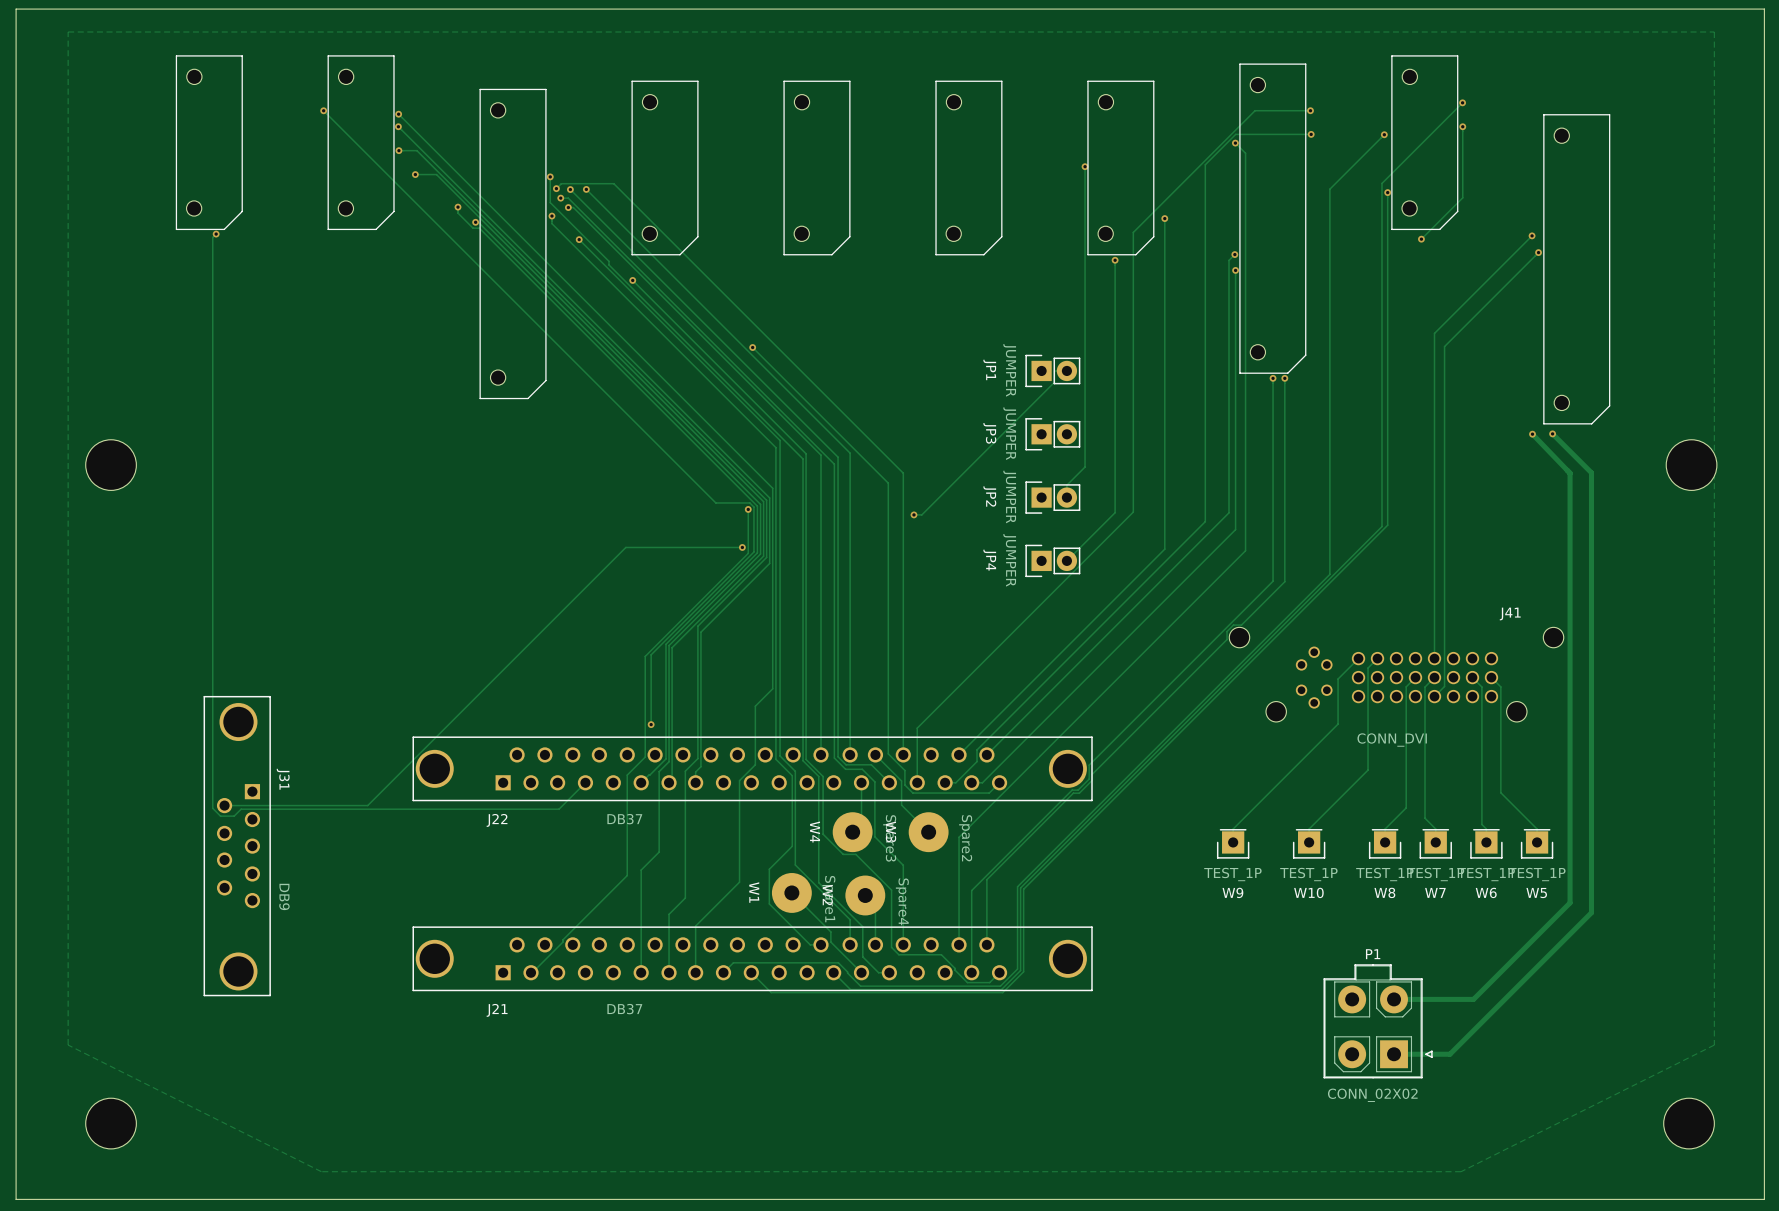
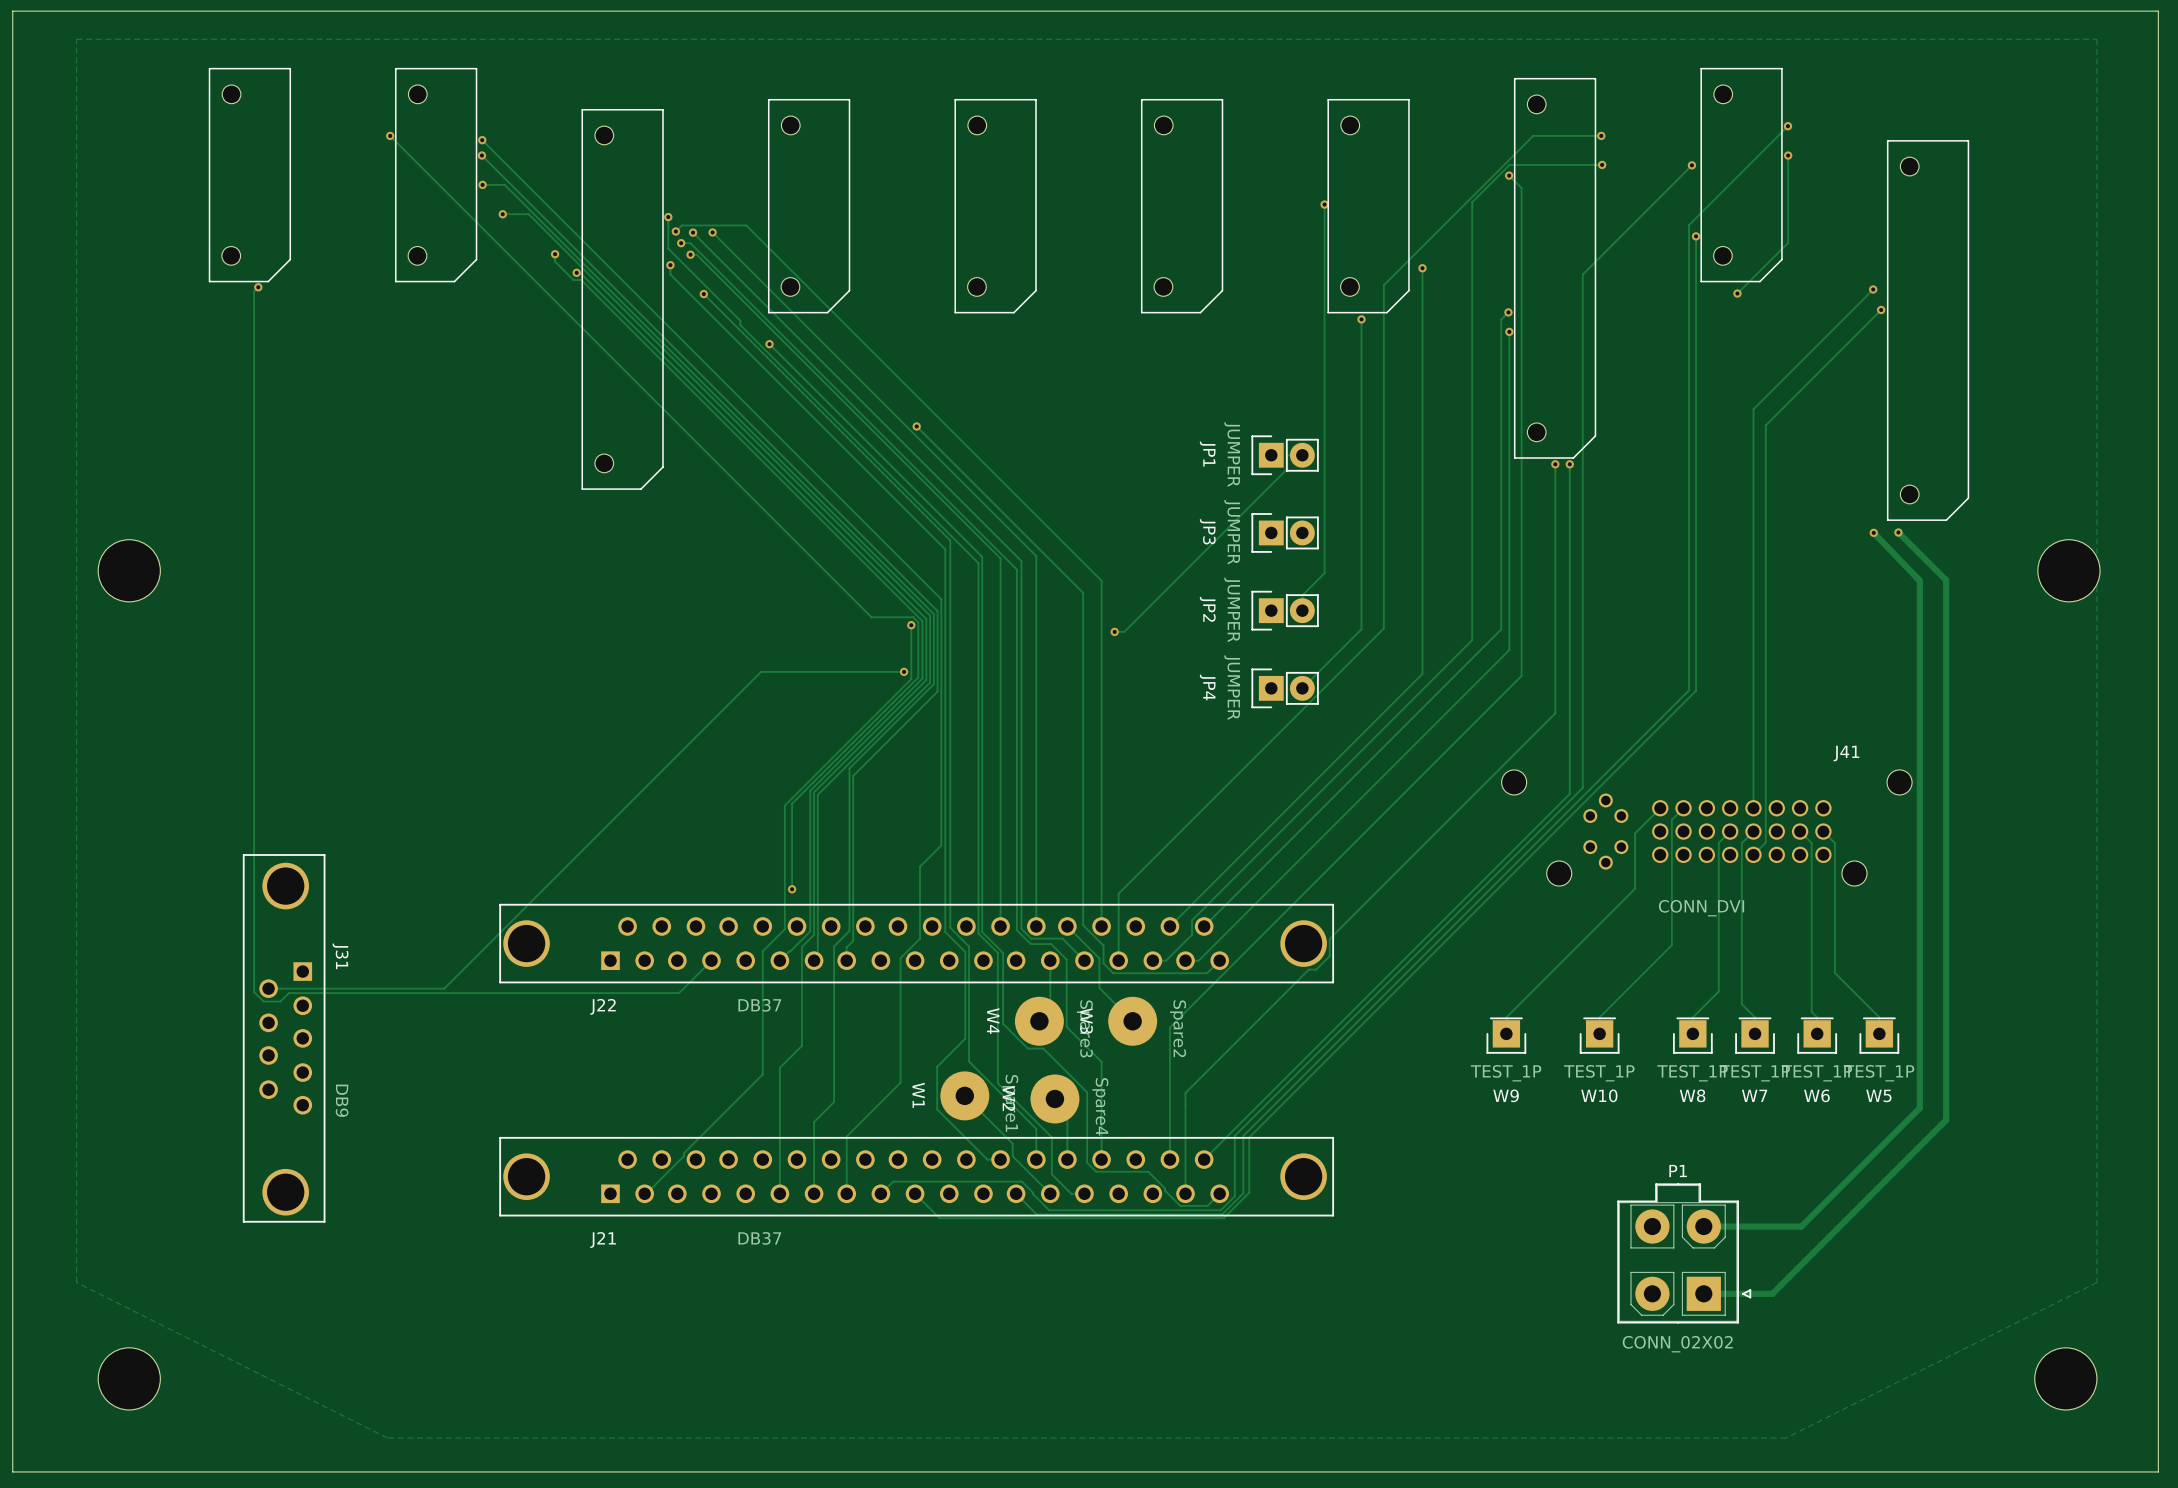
track: (1329, 189) (1329, 574) (1017, 886) (1017, 969) (1011, 974) -> (1625, 232) (1582, 274) (1582, 787) (1234, 1135) (1234, 1196)
track: (1387, 525) (1023, 889) (1023, 926) -> (1696, 644) (1696, 690) (1249, 1137)
track: (1381, 526) (1020, 888) (1020, 970) (1018, 972) -> (1689, 646) (1689, 690) (1243, 1136) (1243, 1193)
track: (1284, 581) (1241, 625) (1233, 625) (1227, 631) (1227, 639) (1092, 774) (1092, 780) (1079, 793) (1073, 793) (986, 879) (986, 944) -> (1569, 713) (1569, 793) (1204, 1159)

